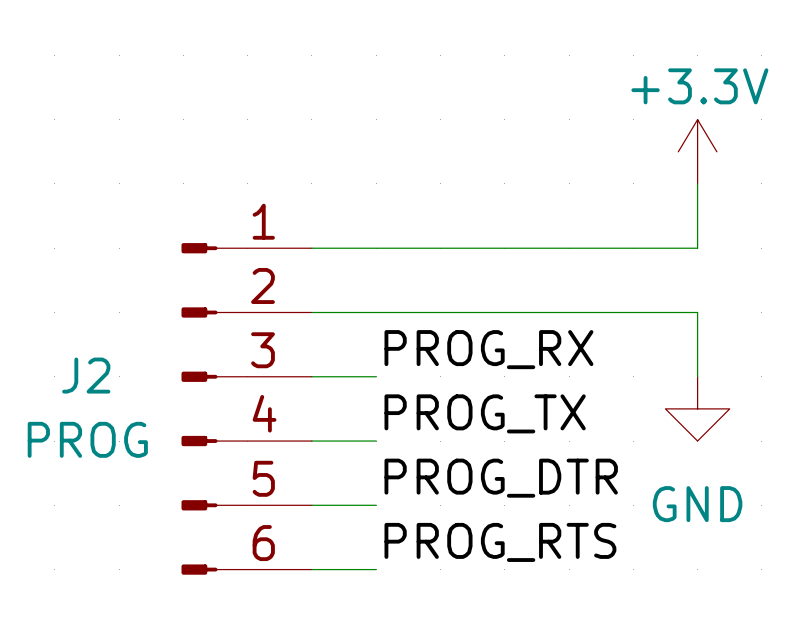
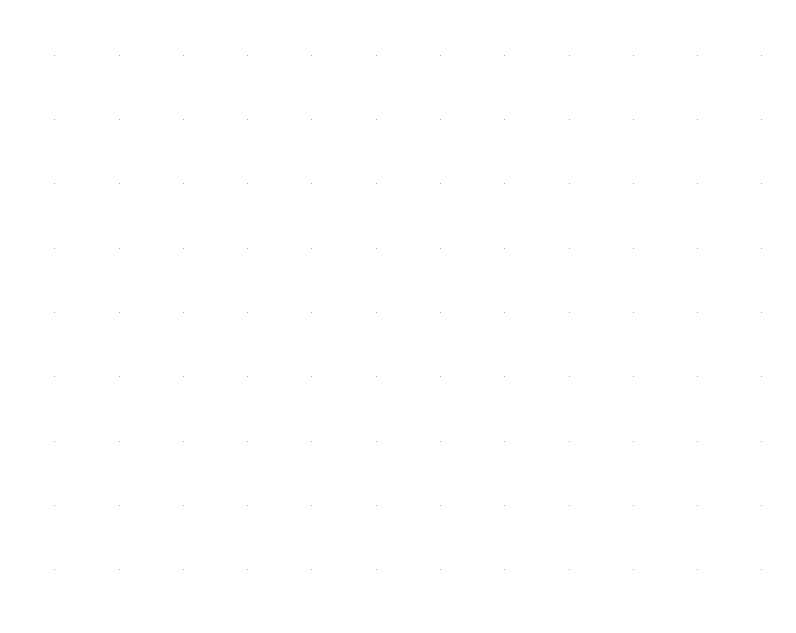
power symbol: +3.3V (697, 151) -> none
wire: (697, 183) (697, 248) (311, 248) -> none
wire: (311, 312) (697, 312) (697, 376) -> none
label: PROG_RX (488, 349) -> none
wire: (311, 376) (376, 376) -> none
J2: PROG (246, 408) -> none
power symbol: GND (697, 408) -> none
label: PROG_TX (485, 413) -> none
wire: (311, 441) (376, 441) -> none
label: PROG_DTR (501, 478) -> none
wire: (311, 505) (376, 505) -> none
label: PROG_RTS (500, 542) -> none
wire: (311, 569) (376, 569) -> none

